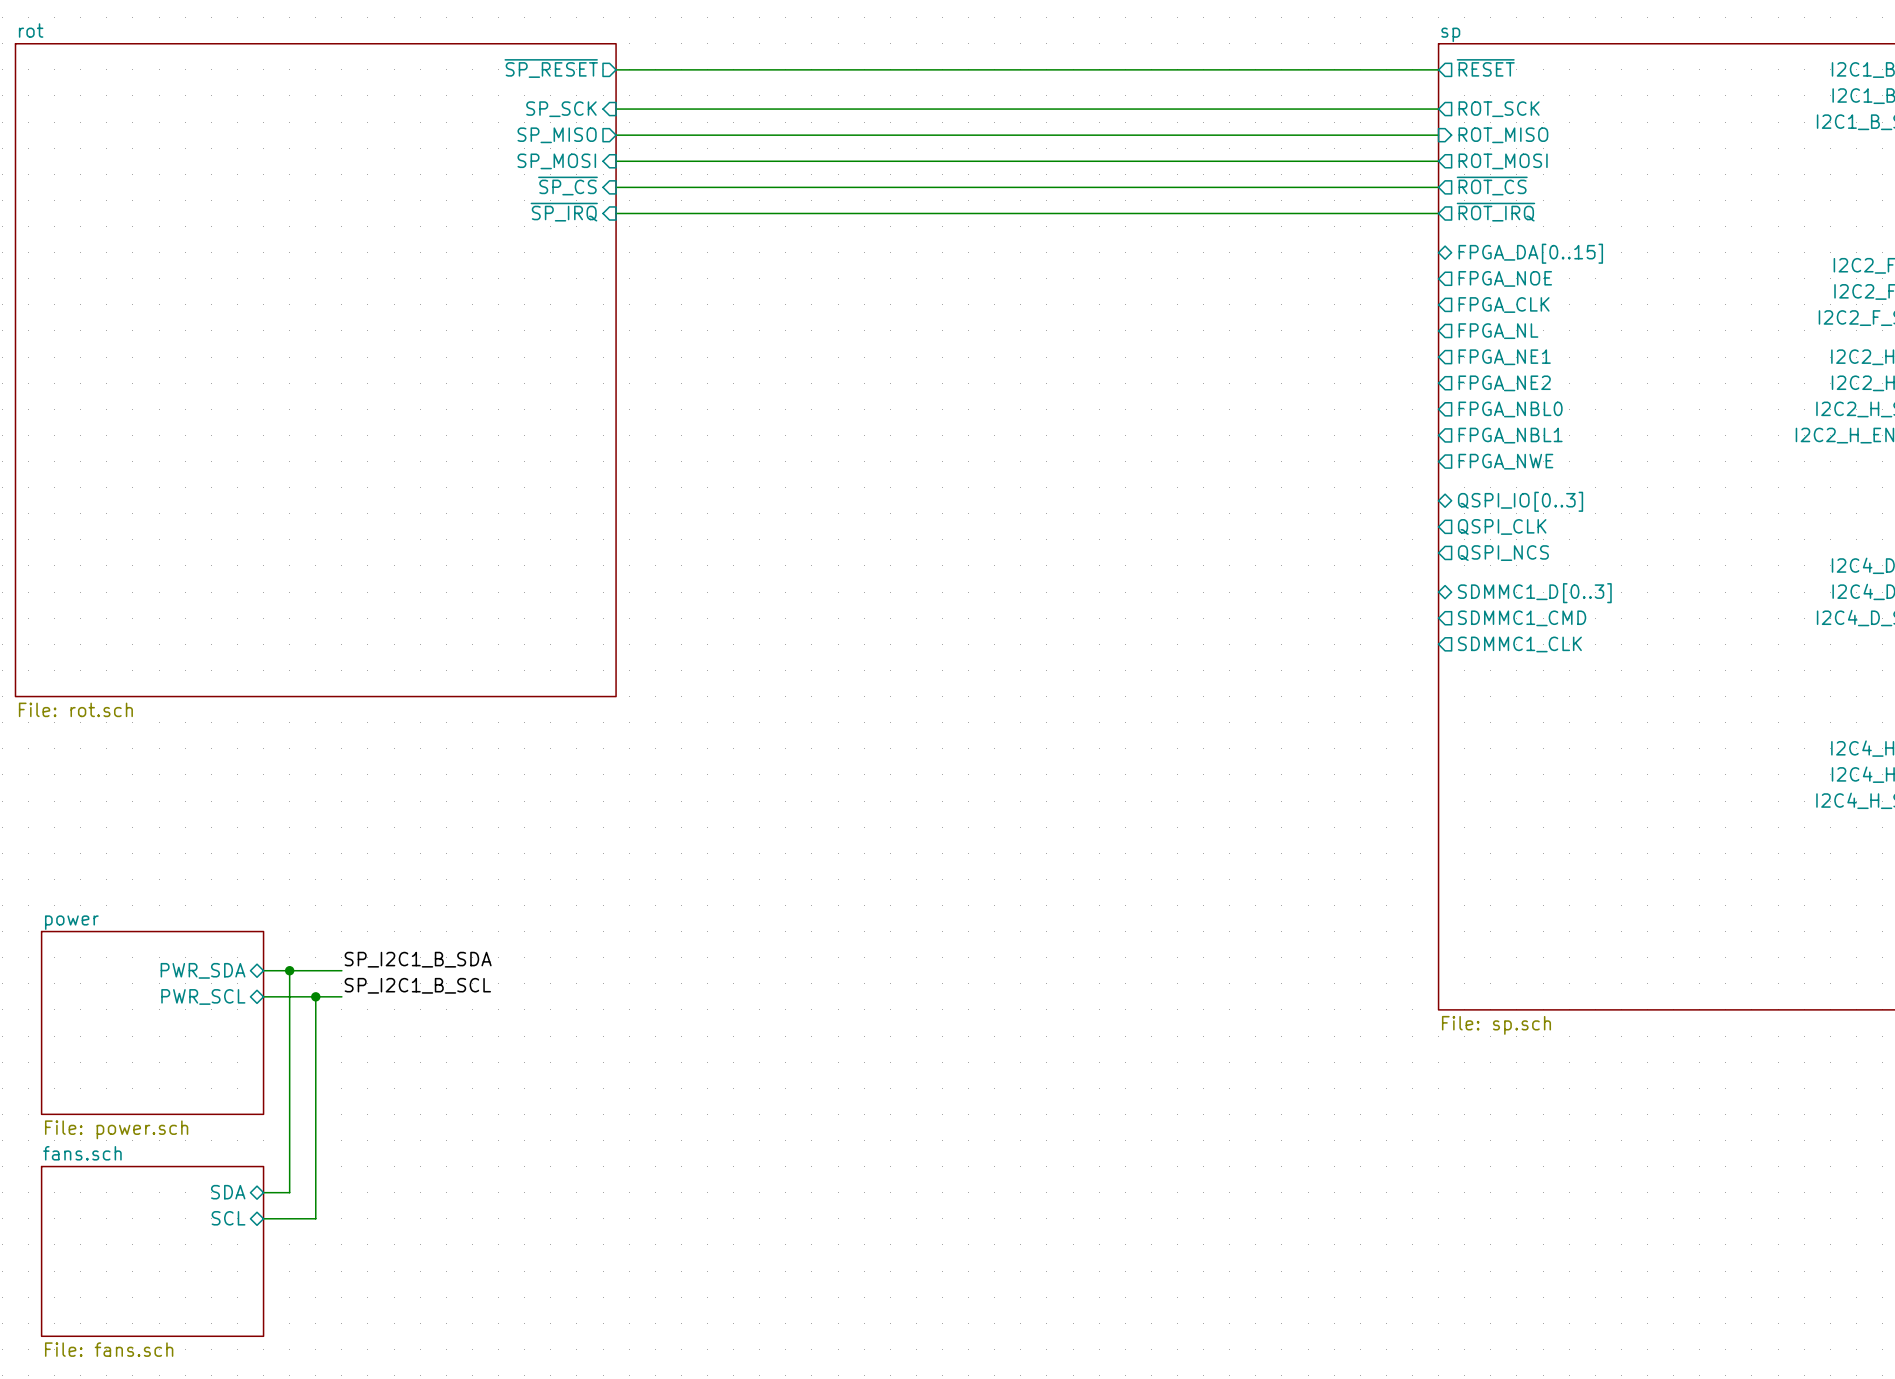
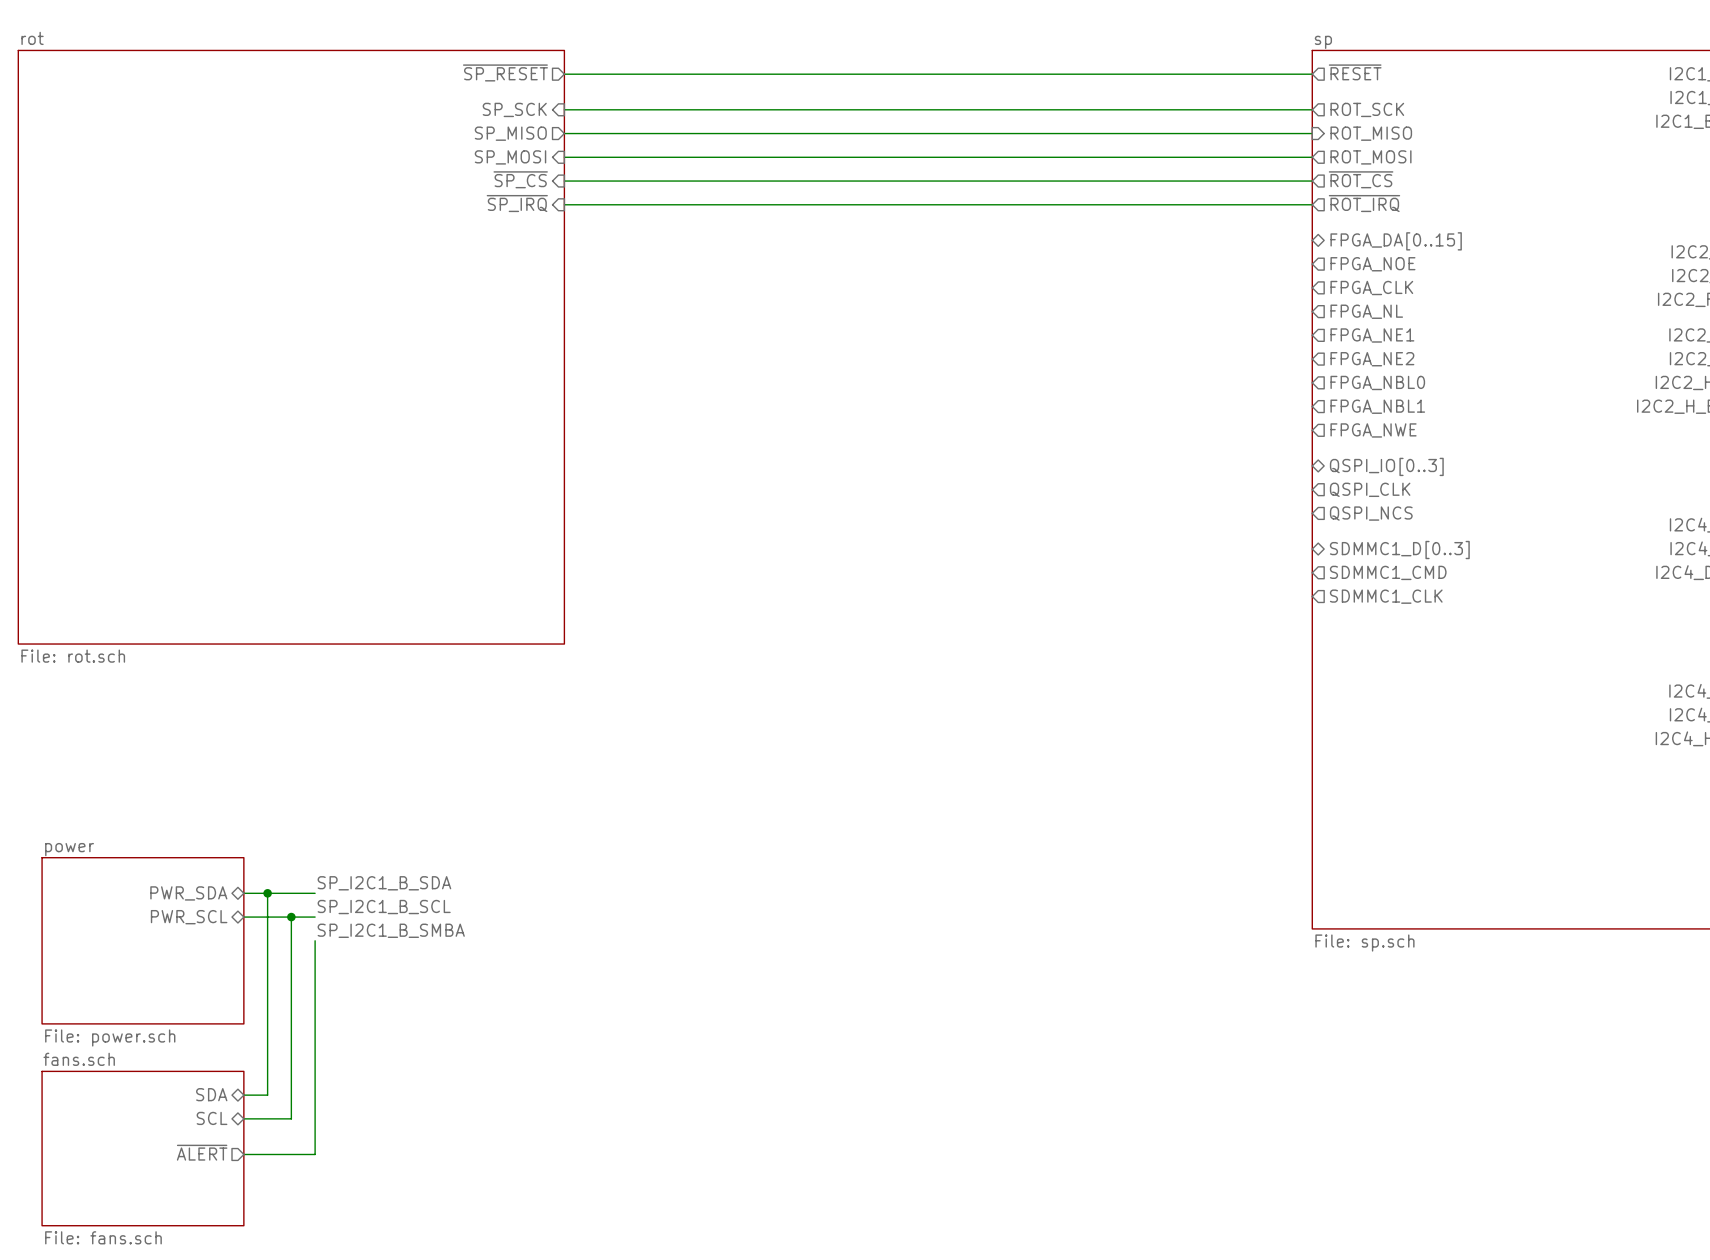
label: none -> SP_I2C1_B_SMBA (391, 930)
wire: none -> (315, 940) (315, 1154) (243, 1154)
sheet pin: none -> ~{ALERT} (202, 1152)

